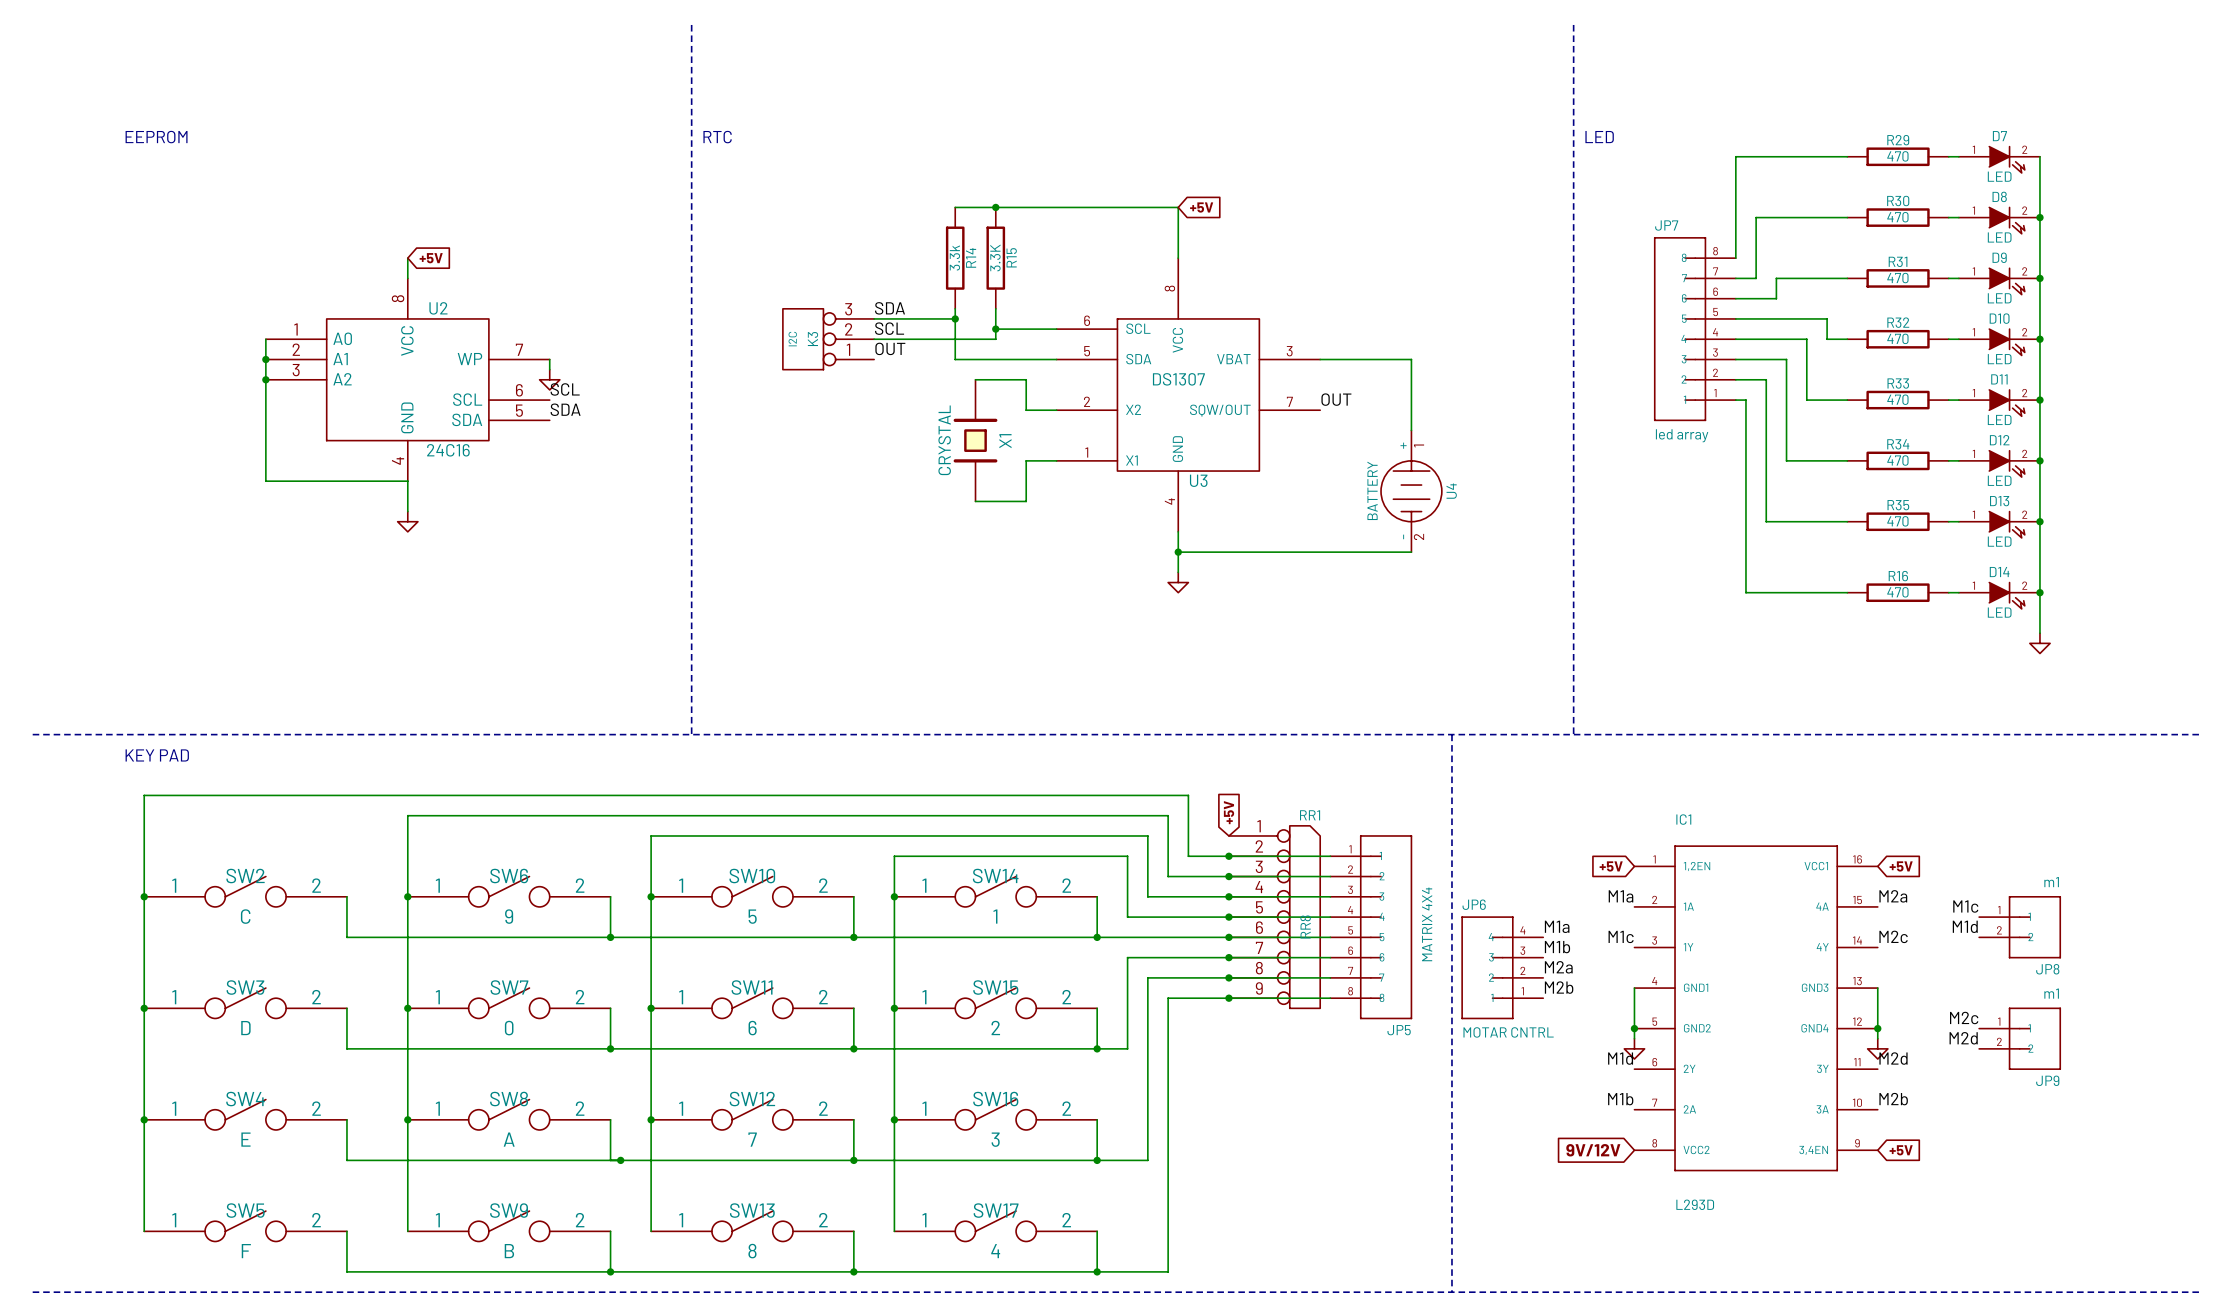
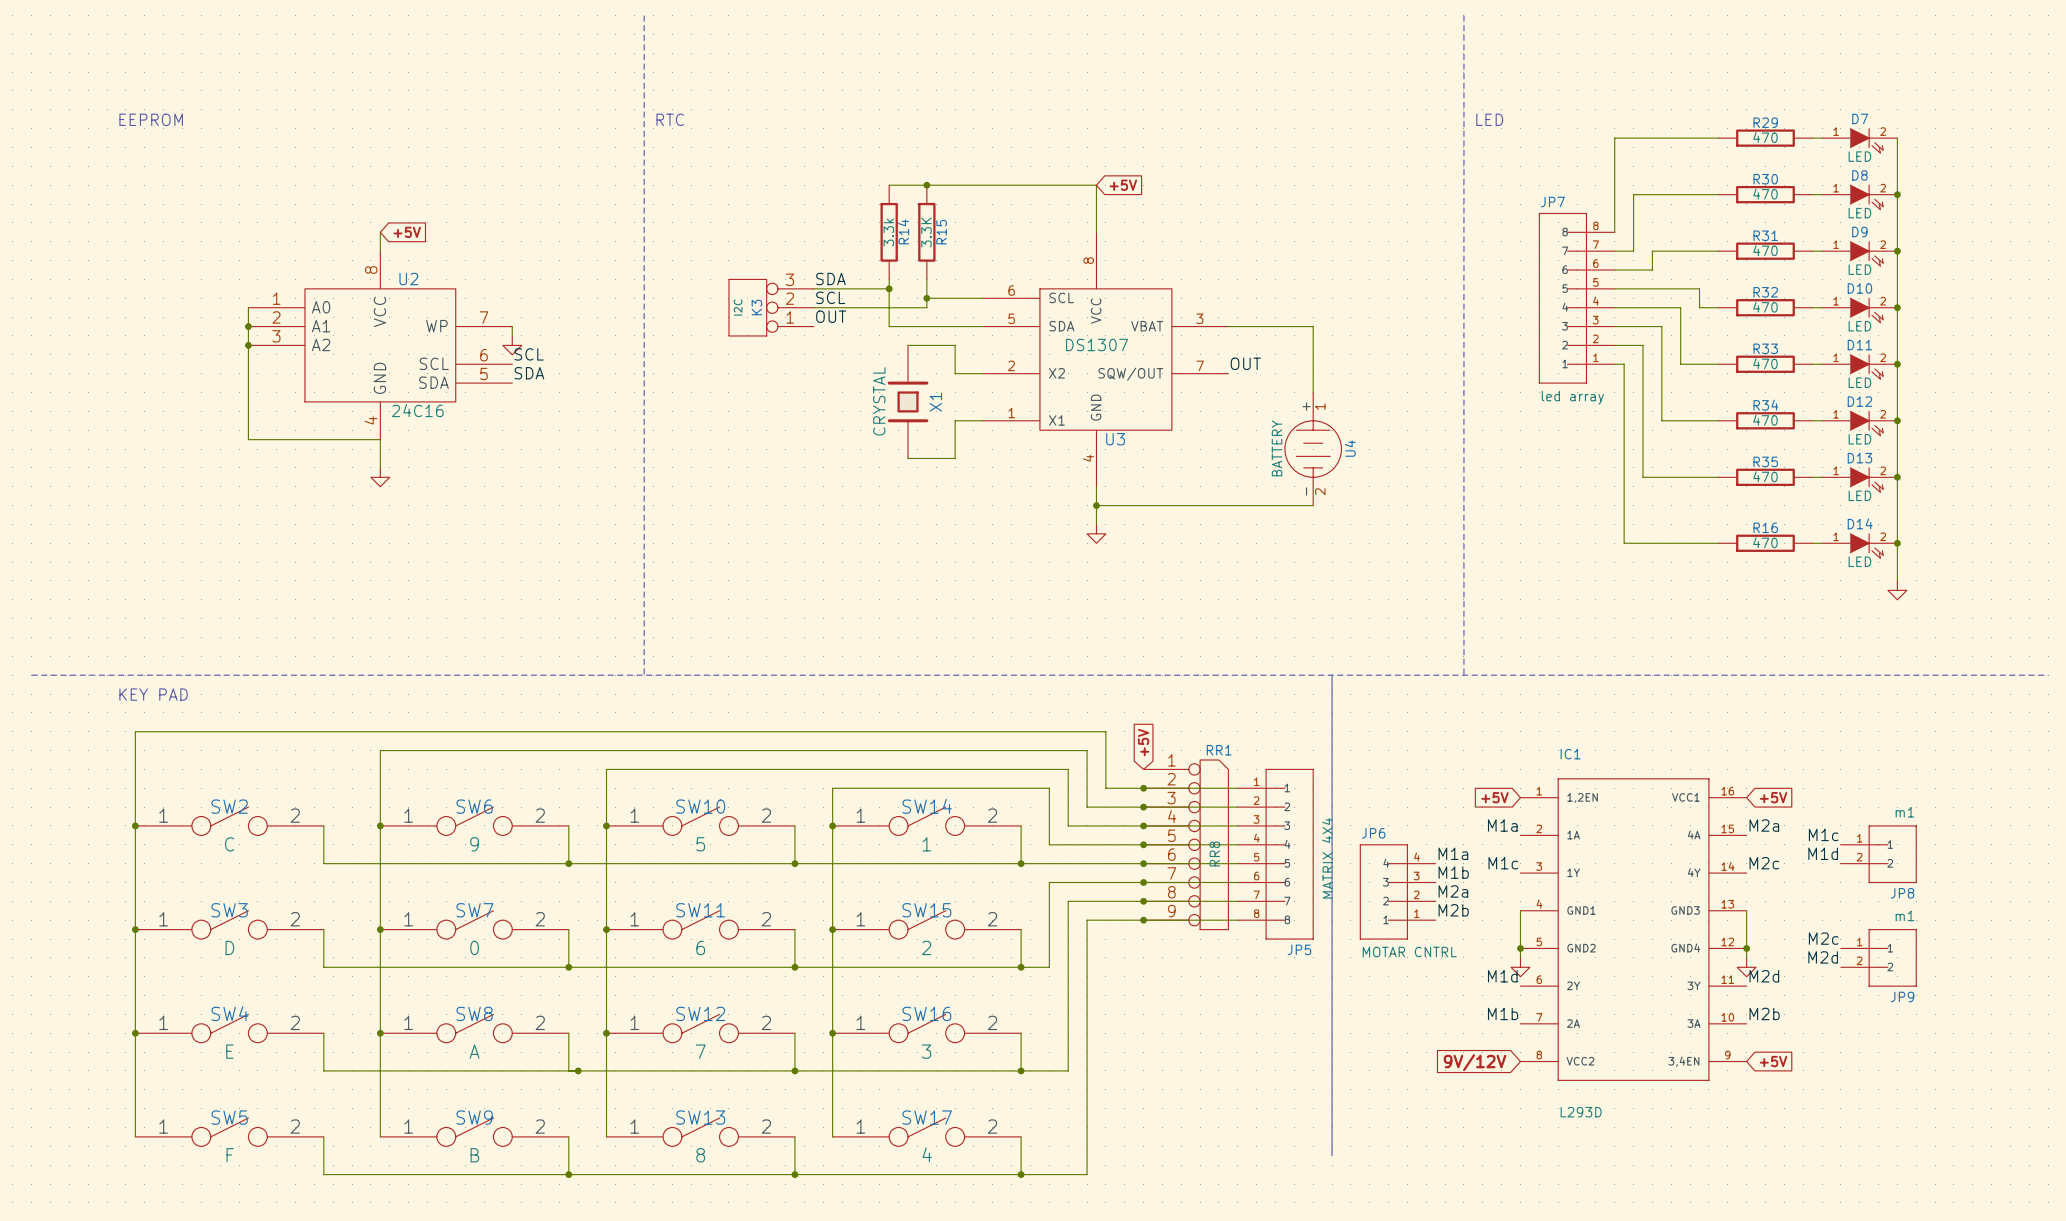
bus: none -> (1332, 675) (1332, 1155)
line: (1451, 734) (1451, 1292) -> none
line: (32, 1292) (2202, 1292) -> none

